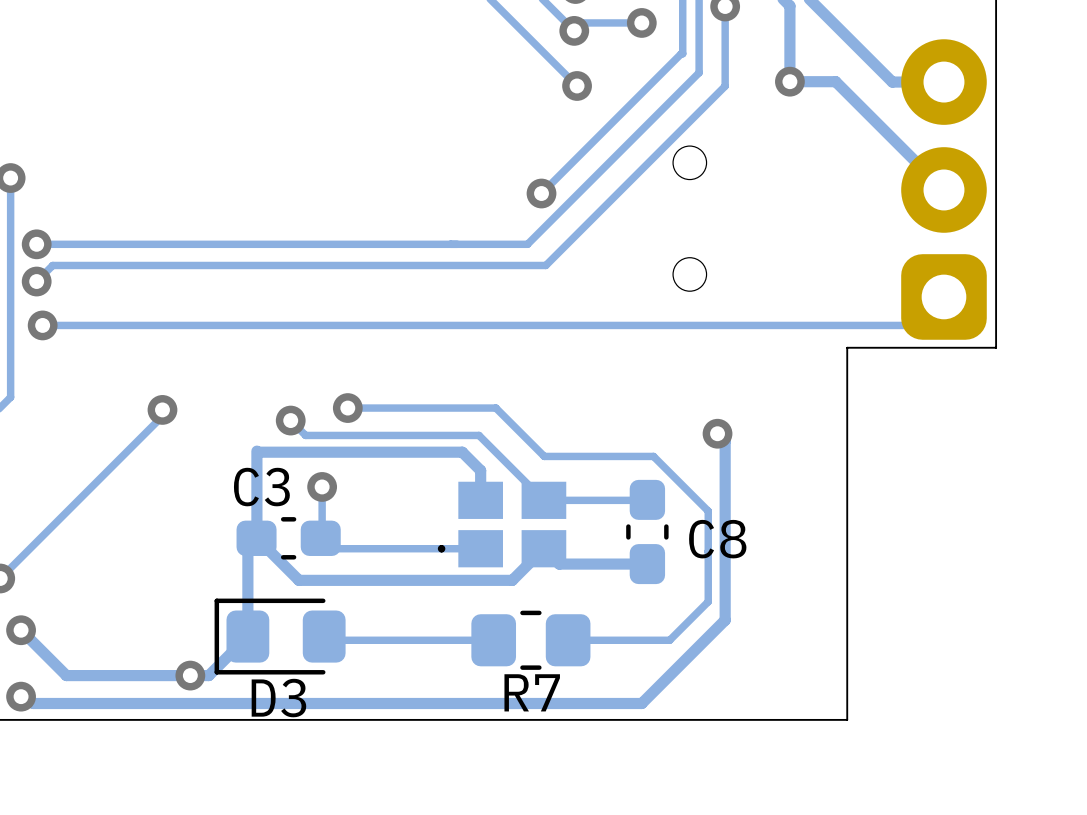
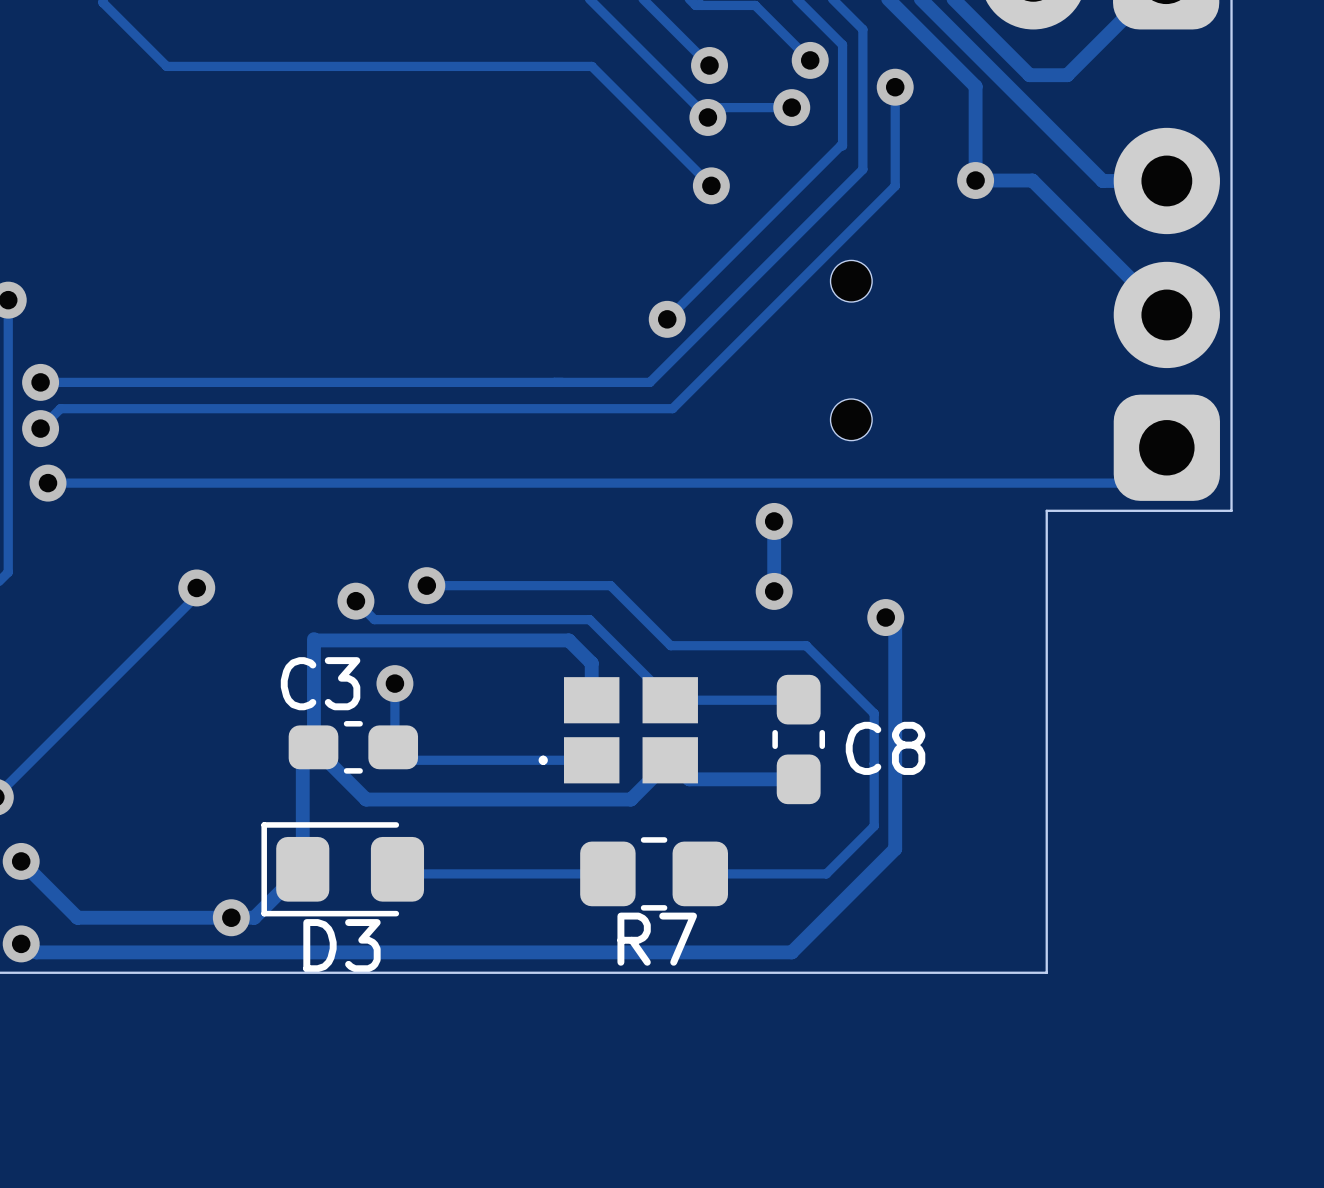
track: none -> (774, 521) (774, 591)
via: none -> (774, 521)
via: none -> (774, 591)

